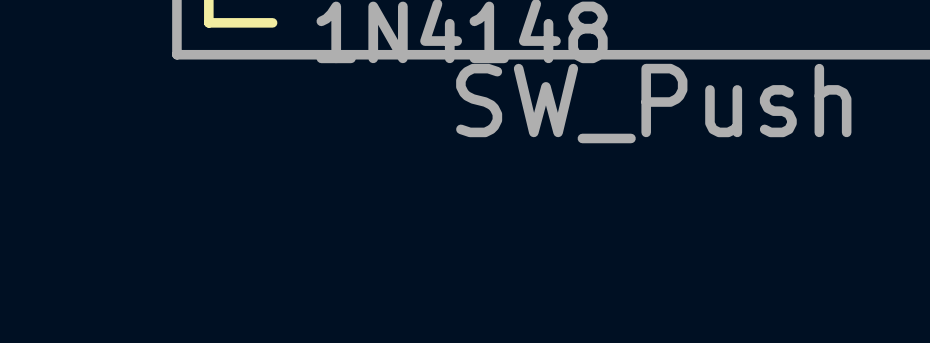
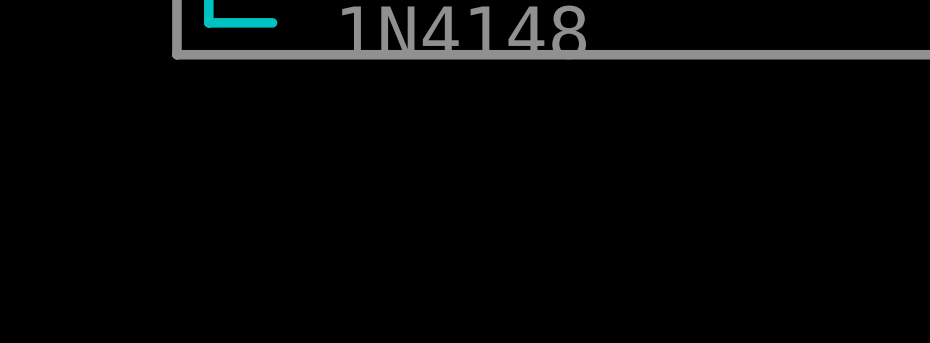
part value: SW_Push (653, 103) -> none

